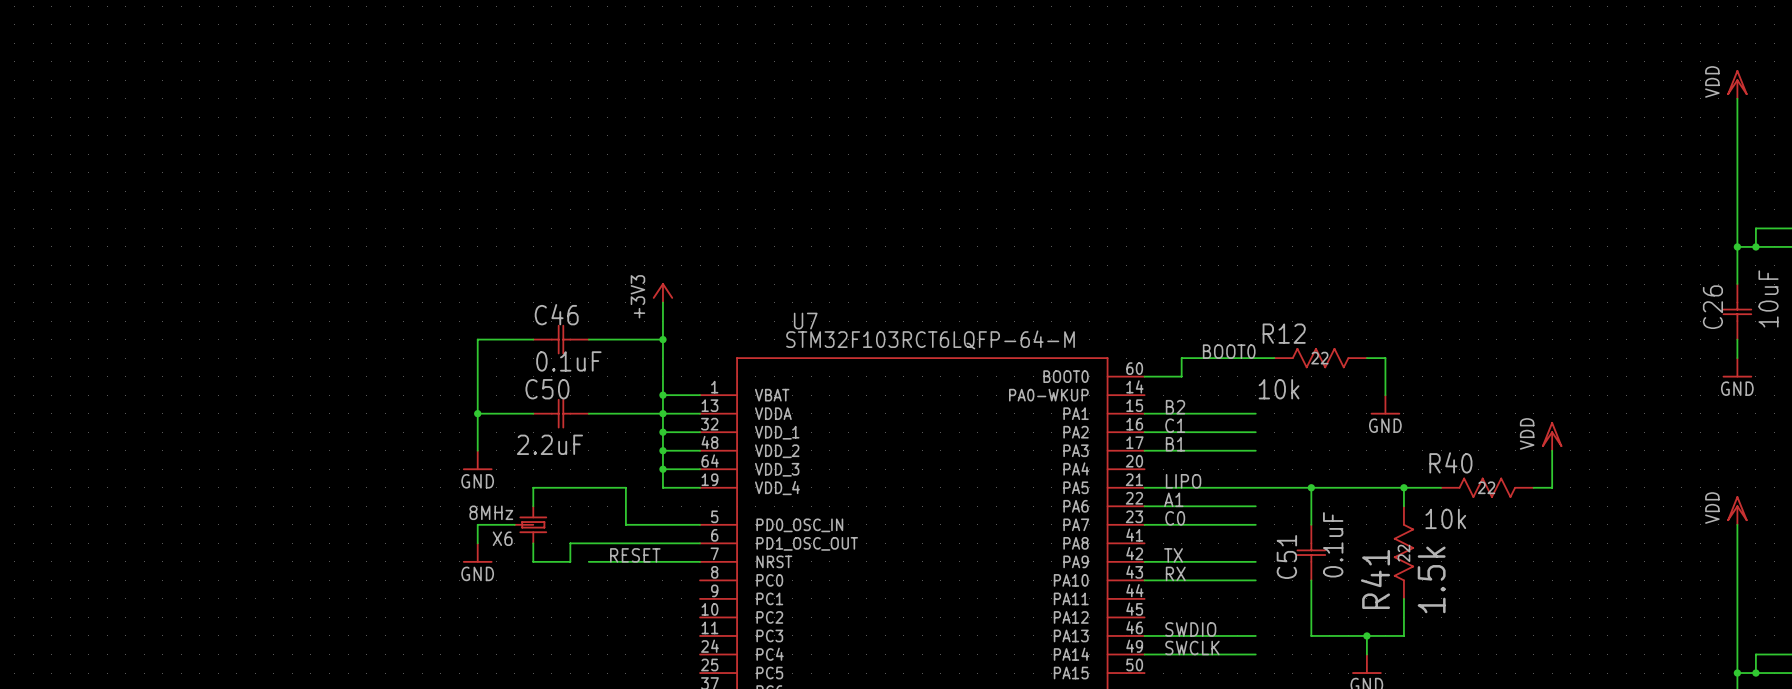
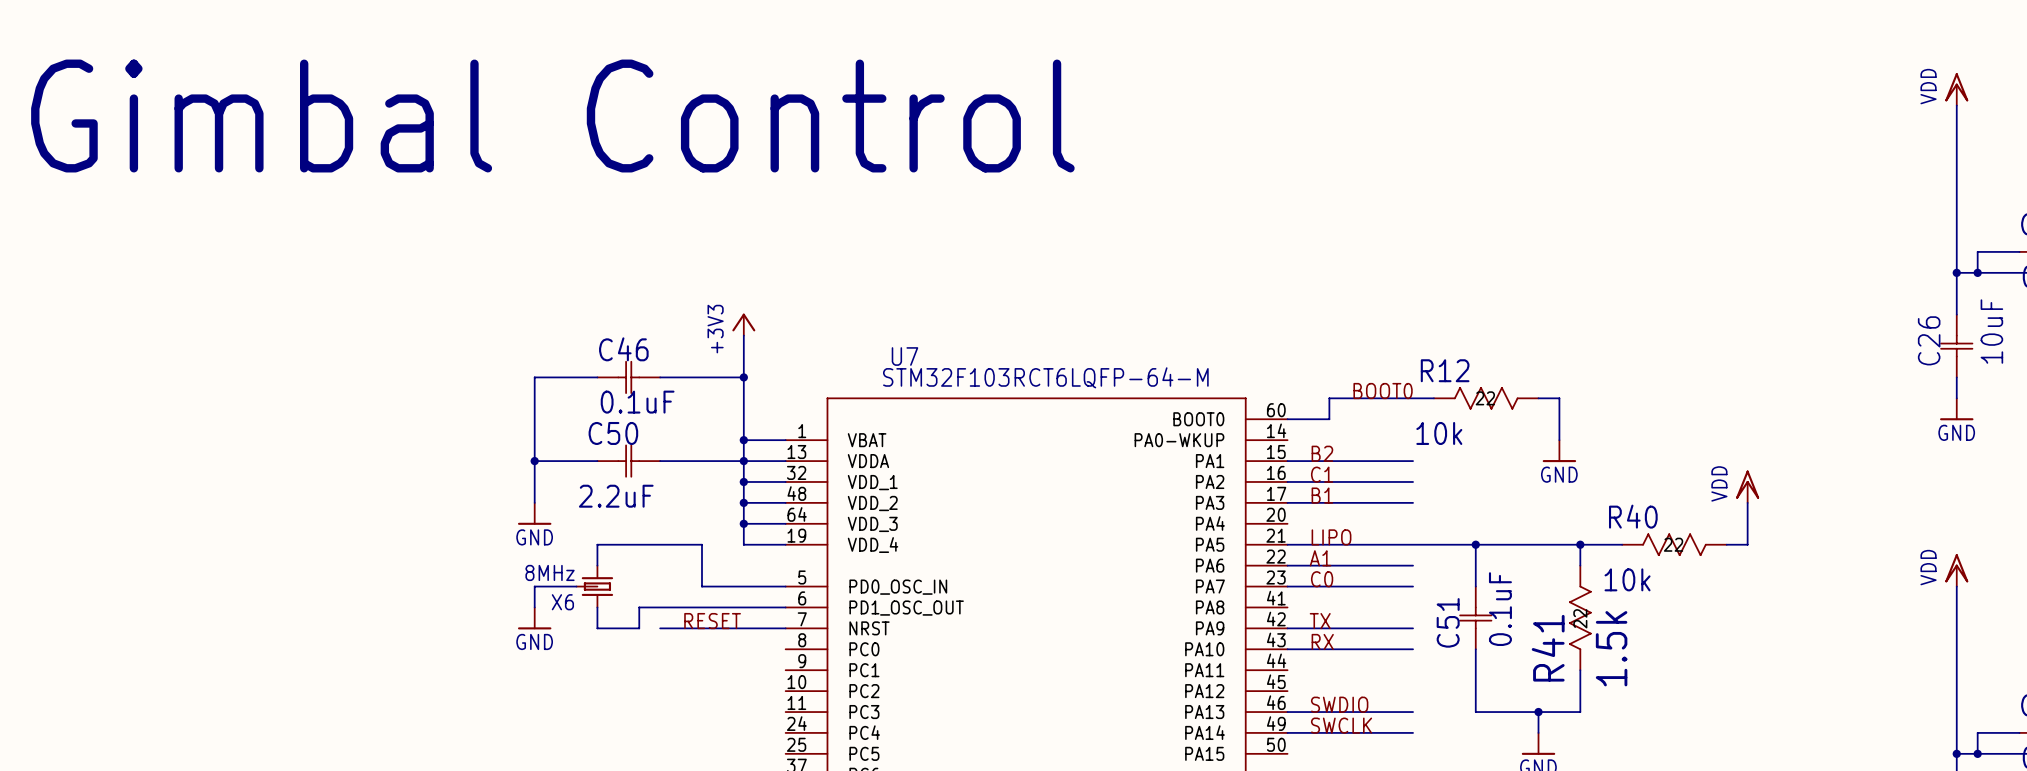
text: none -> Gimbal Control (552, 116)

